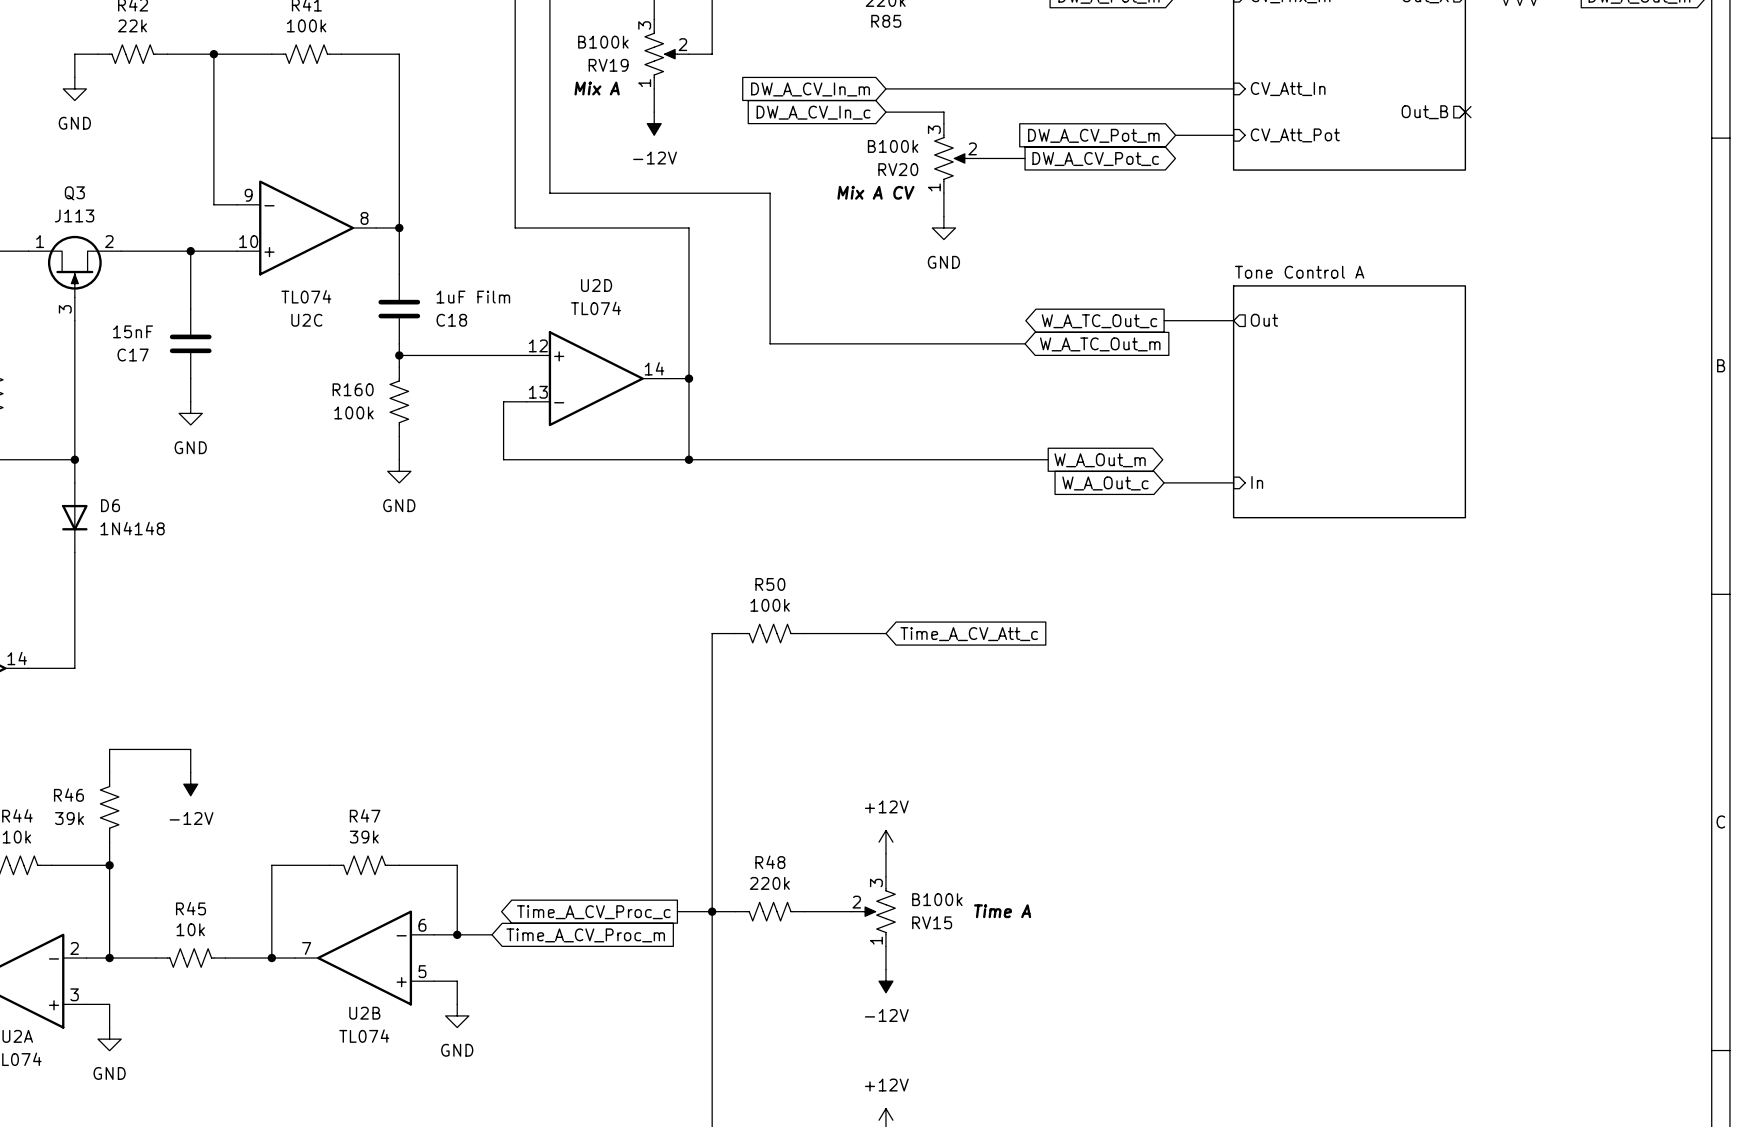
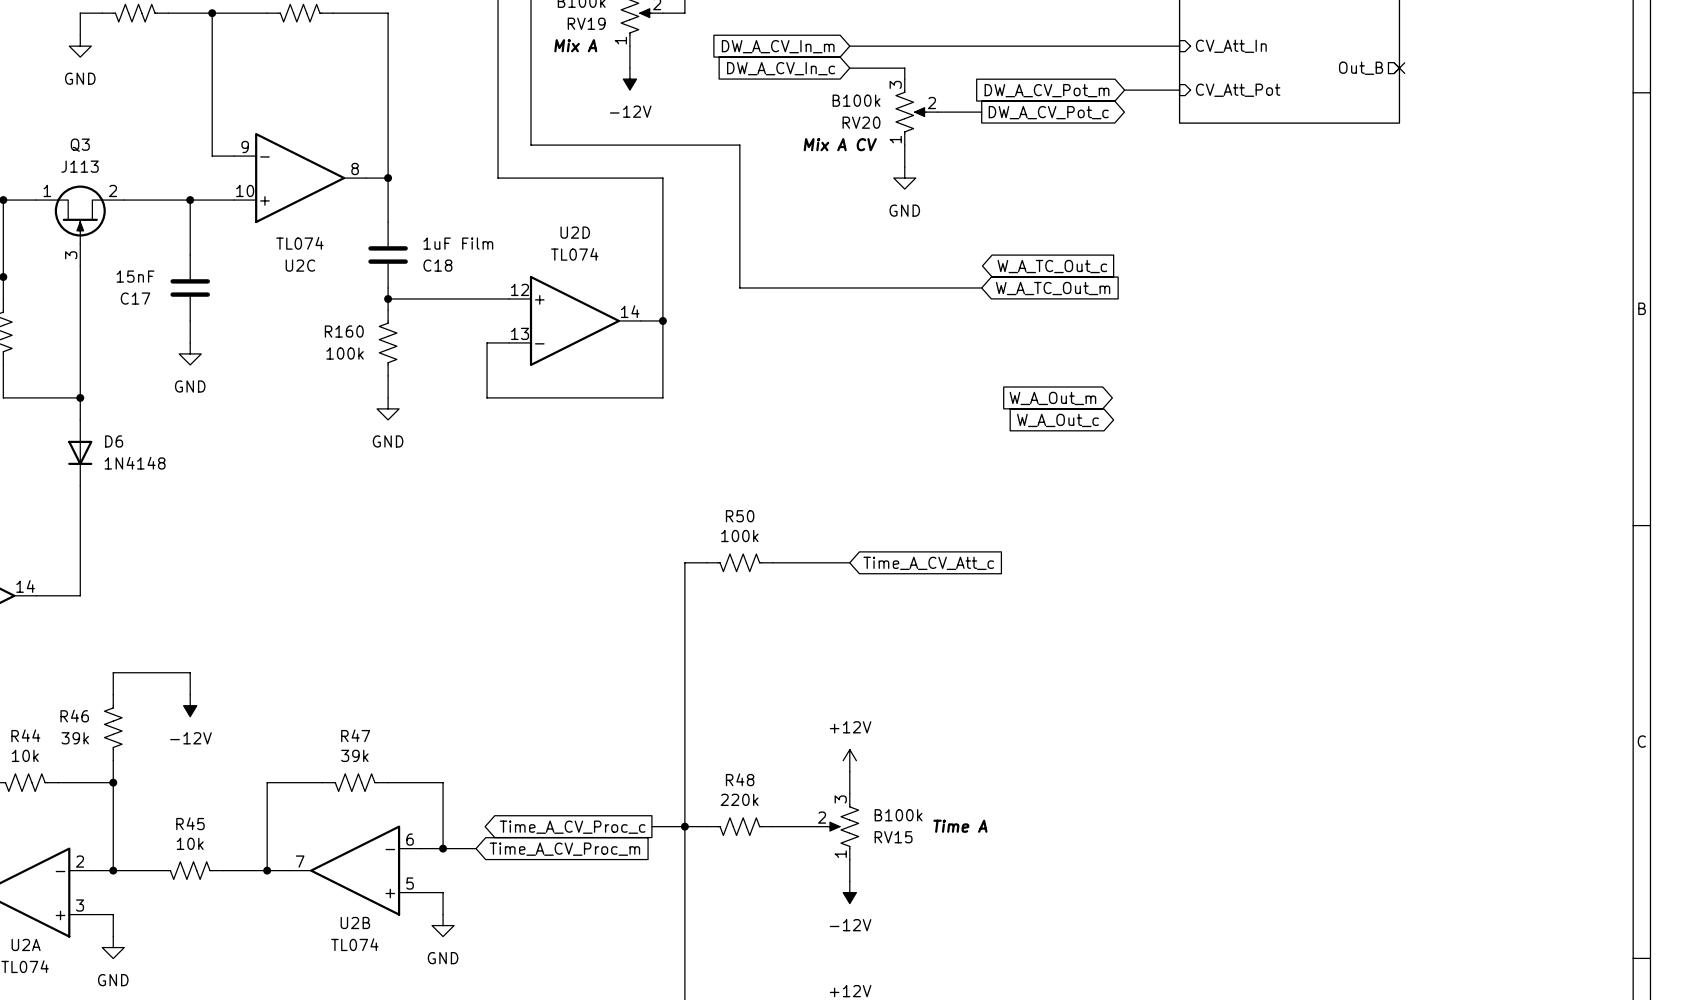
wire: (1164, 320) (1233, 320) -> none
sheet pin: Out (1264, 320) -> none
sheet Tone Control A: (1349, 401) -> none
wire: (688, 459) (1048, 459) -> none
junction: (688, 459) -> none
wire: (1164, 482) (1233, 482) -> none
sheet pin: In (1257, 482) -> none

